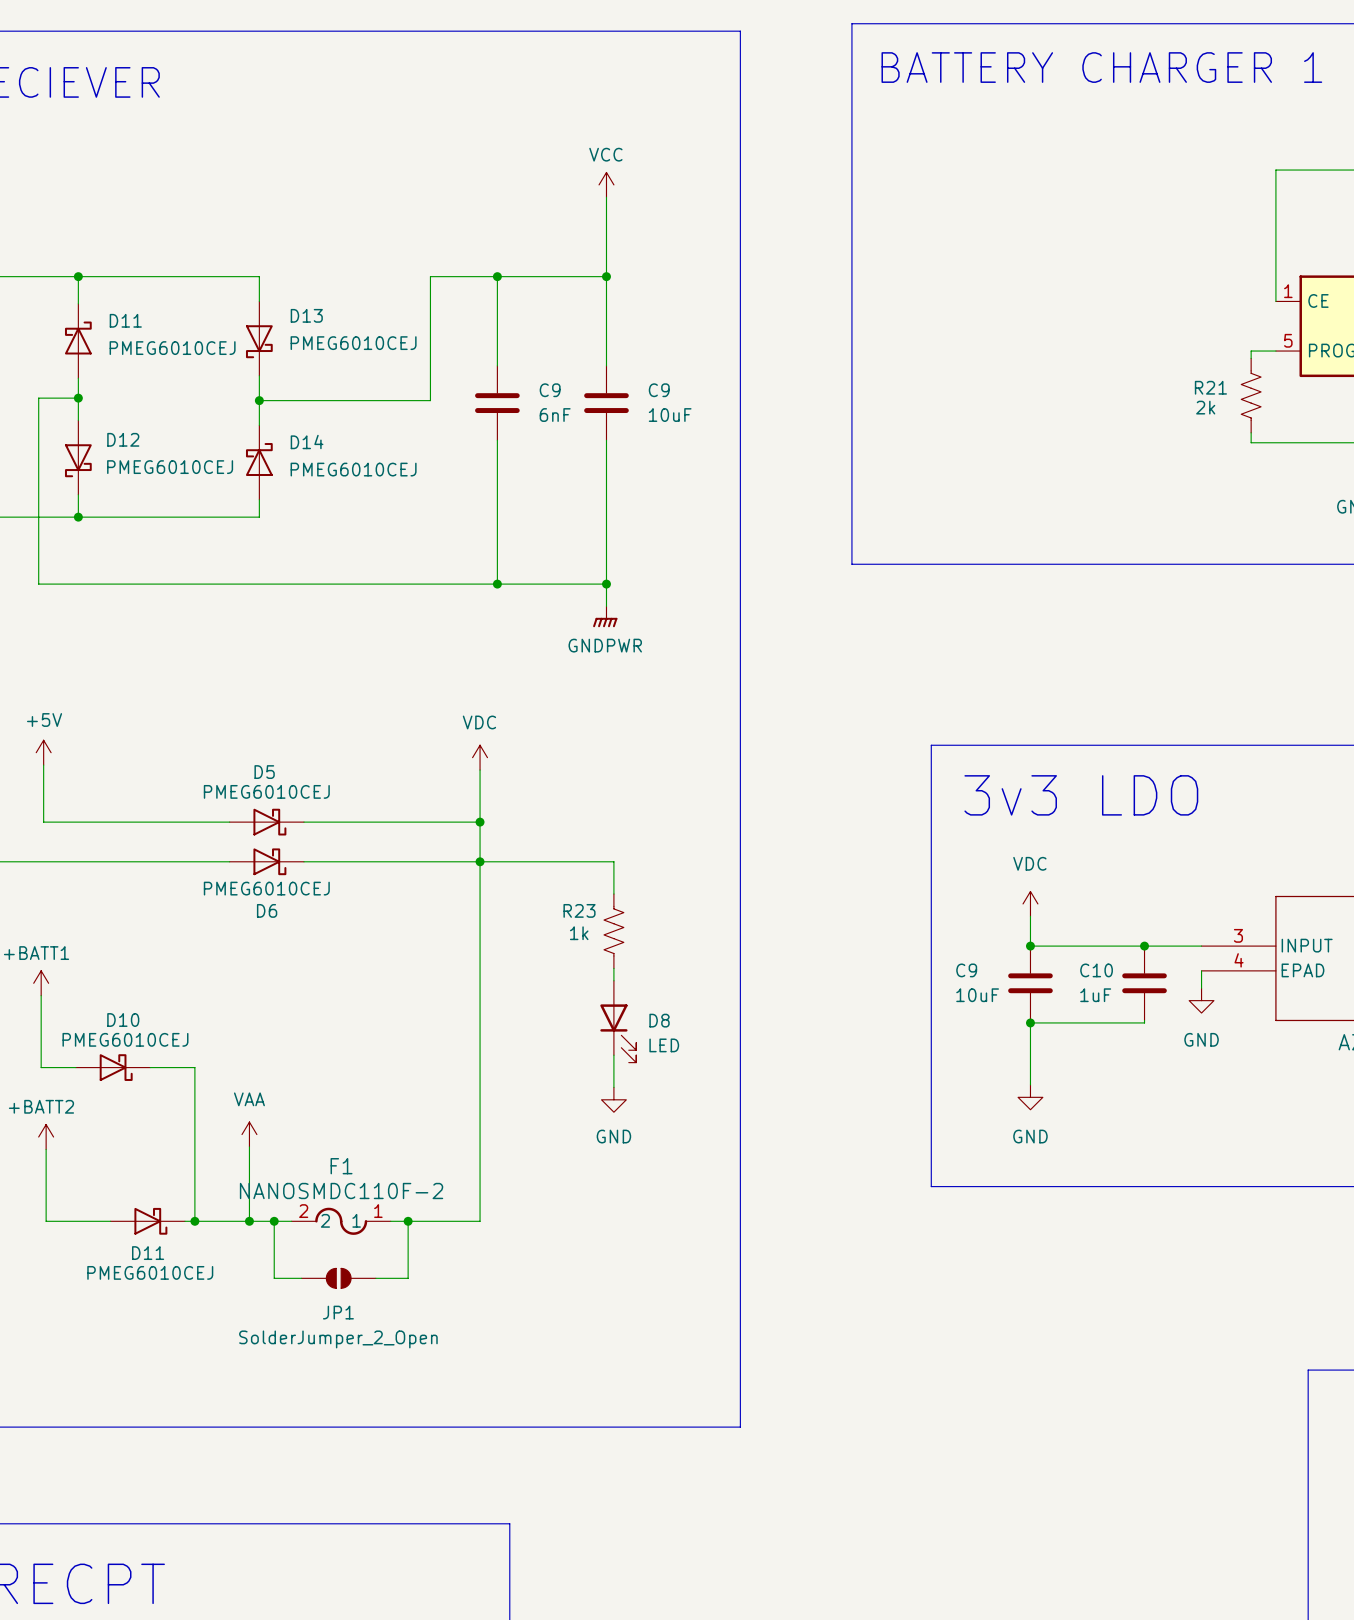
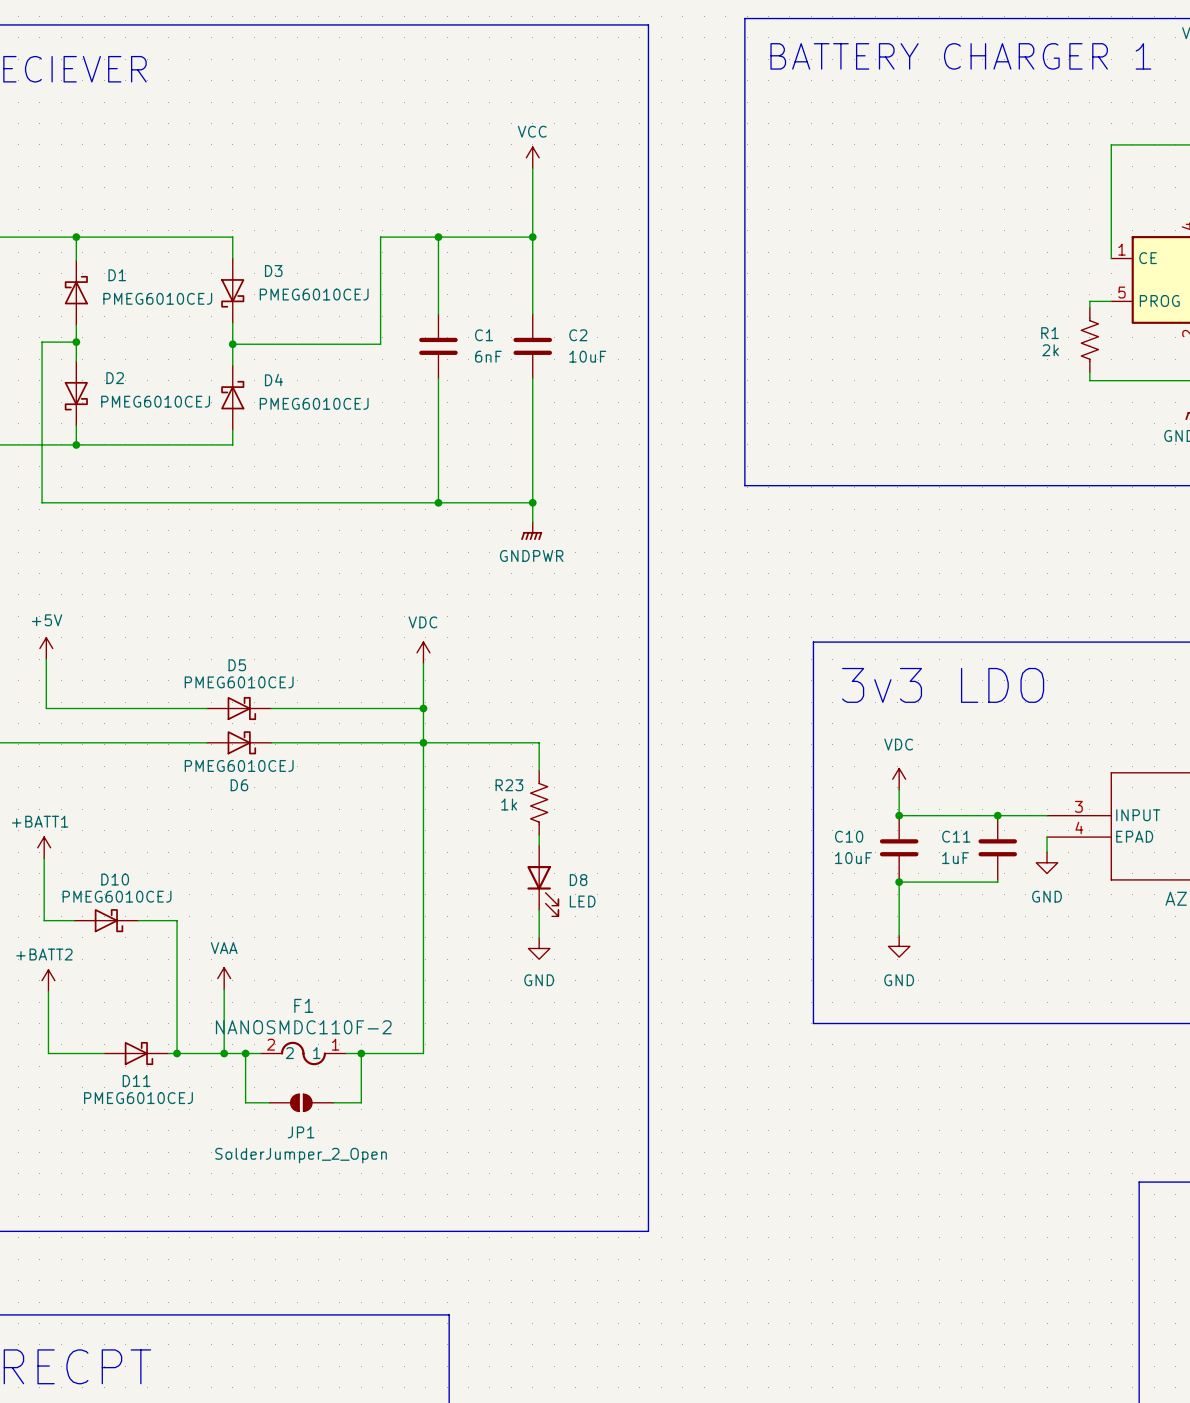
D13 name: D13 (306, 315) -> D3 (273, 270)
D11 name: D11 (125, 320) -> D1 (117, 275)
R21 name: R21 (1210, 387) -> R1 (1050, 333)
C9 name: C9 (550, 390) -> C1 (484, 335)
C9 name: C9 (659, 390) -> C2 (578, 335)
D12 name: D12 (123, 439) -> D2 (115, 378)
D14 name: D14 (307, 442) -> D4 (273, 380)
C9 name: C9 (966, 970) -> C10 (849, 836)
C10 name: C10 (1096, 970) -> C11 (956, 836)

